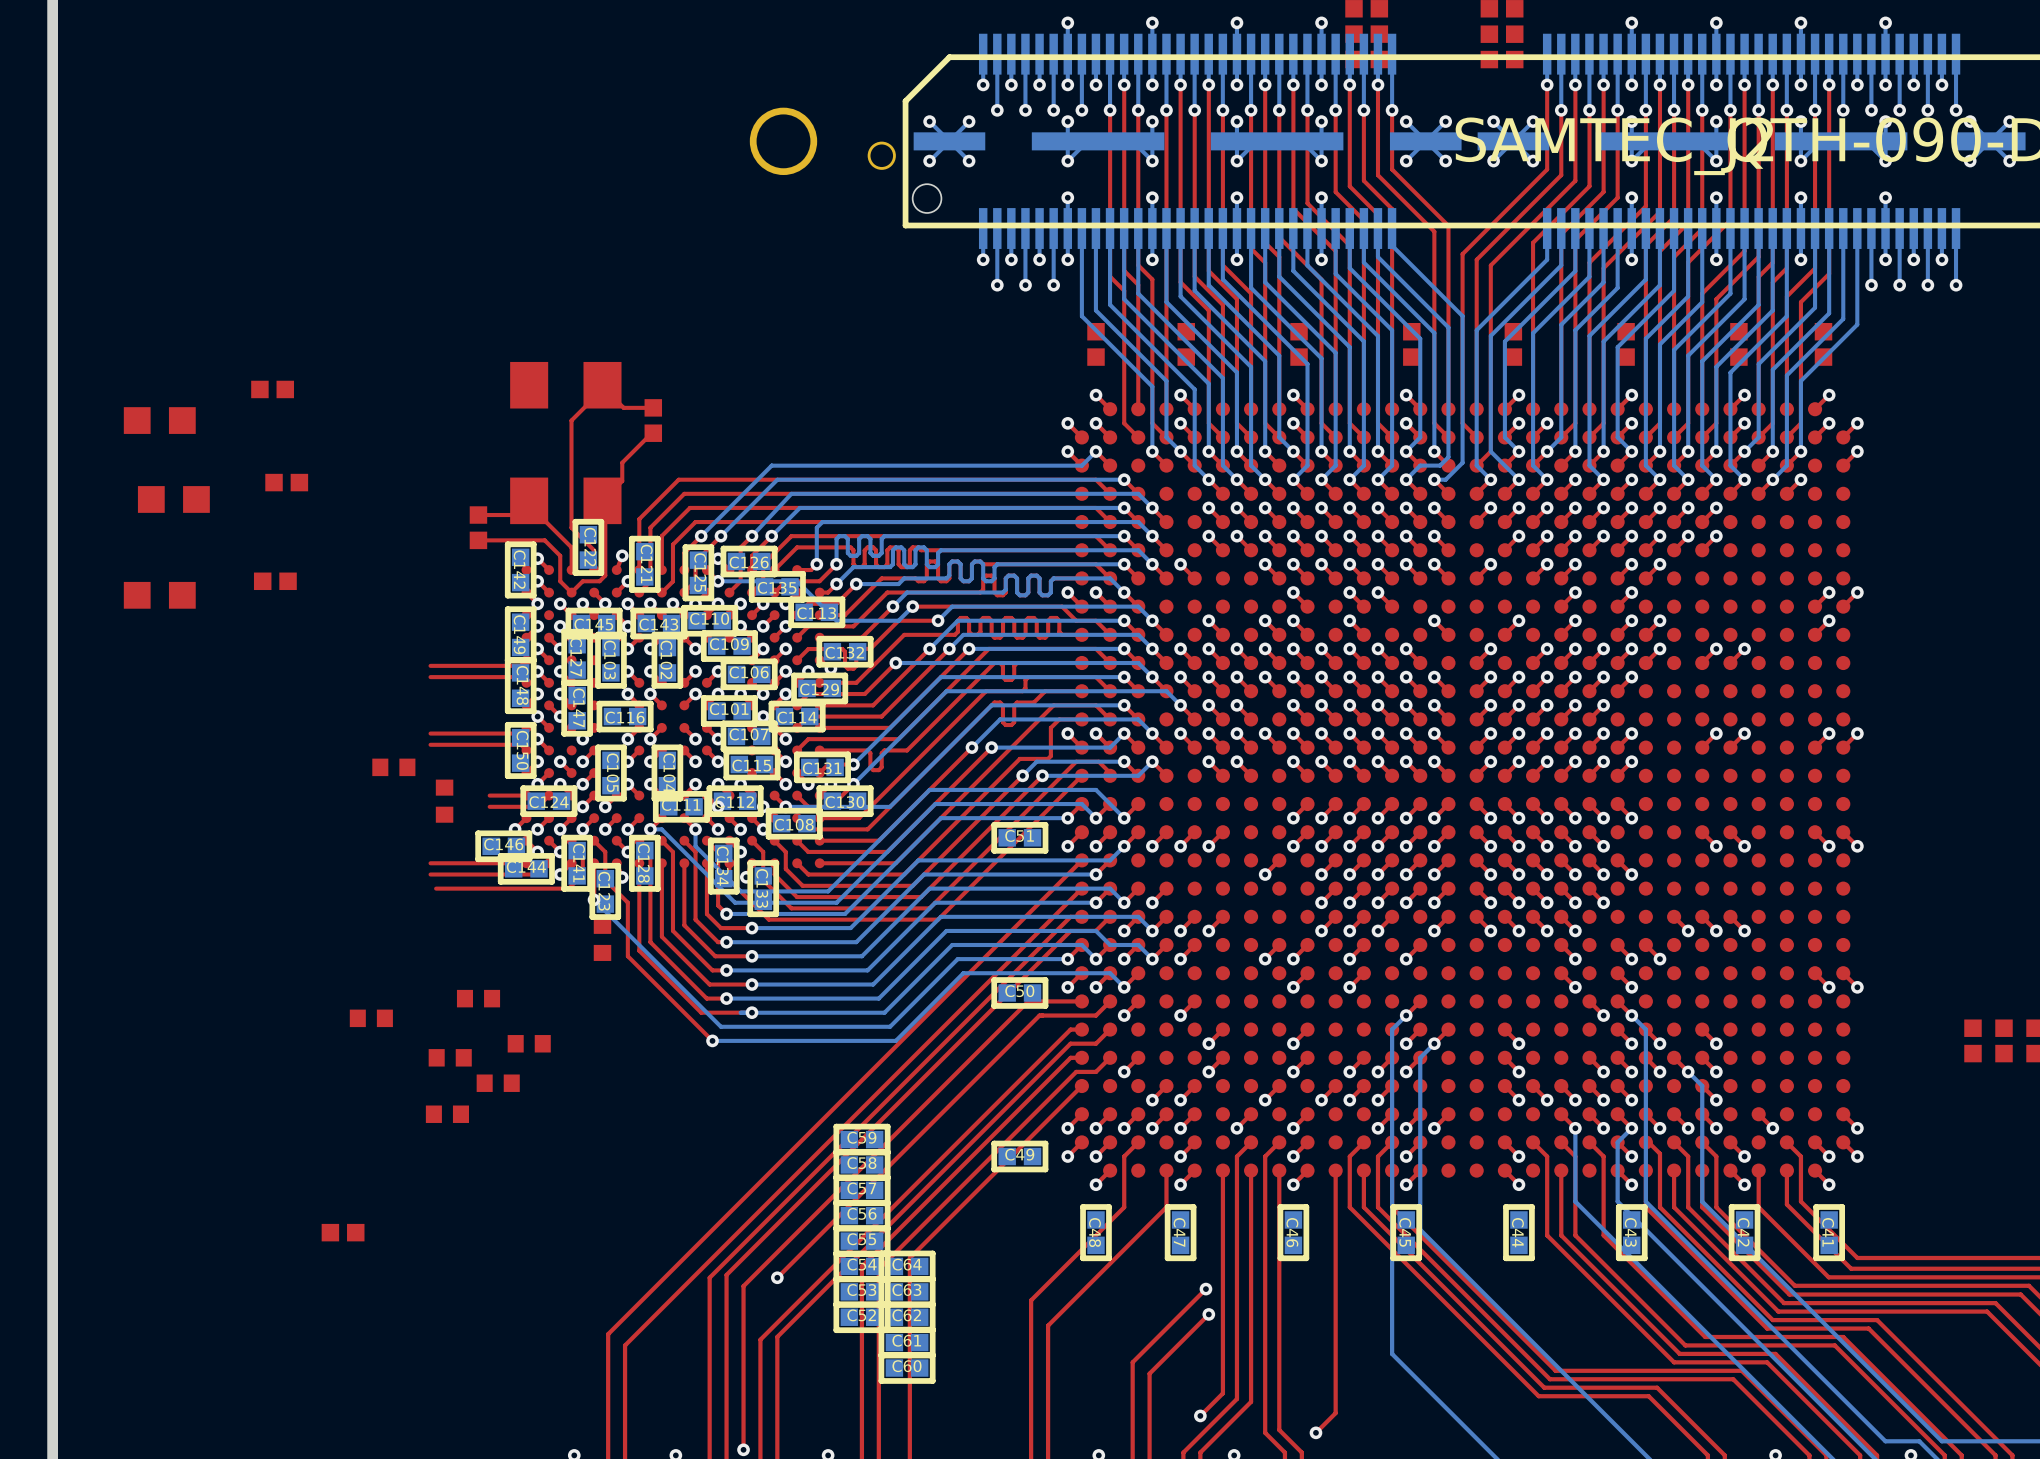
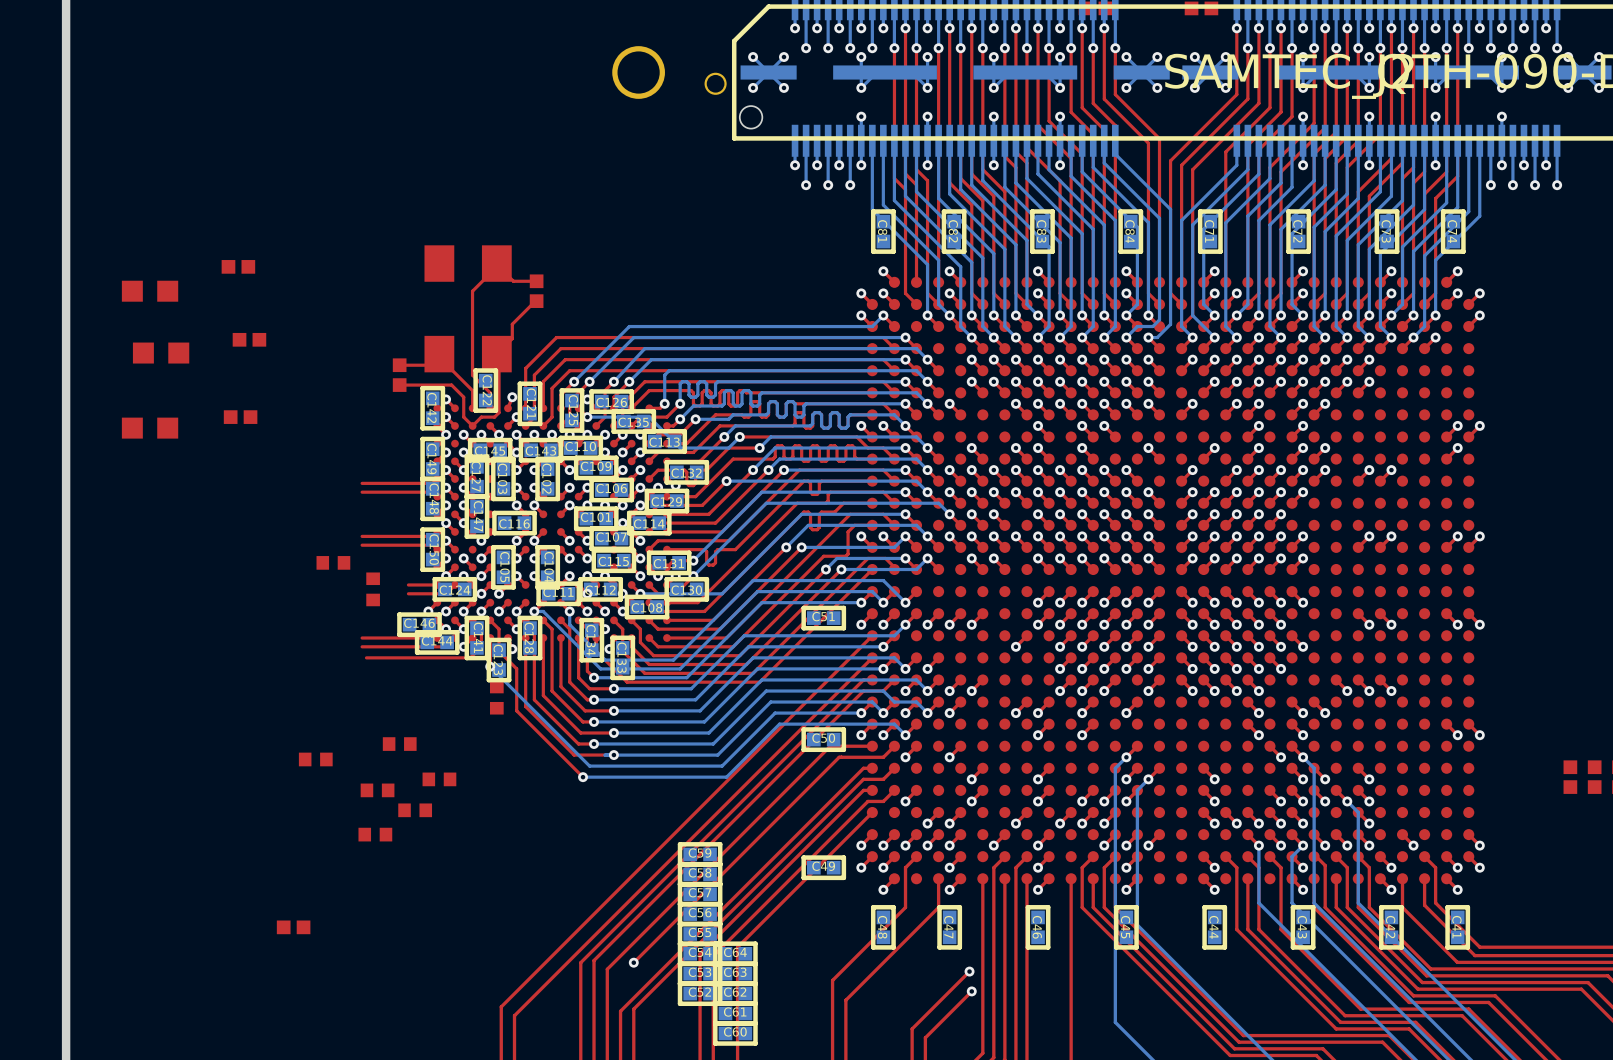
C81 side: top (1096, 344) -> bottom (883, 231)
C82 side: top (1186, 344) -> bottom (954, 231)
C83 side: top (1299, 344) -> bottom (1042, 231)
C84 side: top (1411, 344) -> bottom (1130, 231)
C71 side: top (1513, 344) -> bottom (1210, 231)
C72 side: top (1626, 344) -> bottom (1298, 231)
C73 side: top (1738, 344) -> bottom (1387, 231)
C74 side: top (1823, 344) -> bottom (1453, 231)

